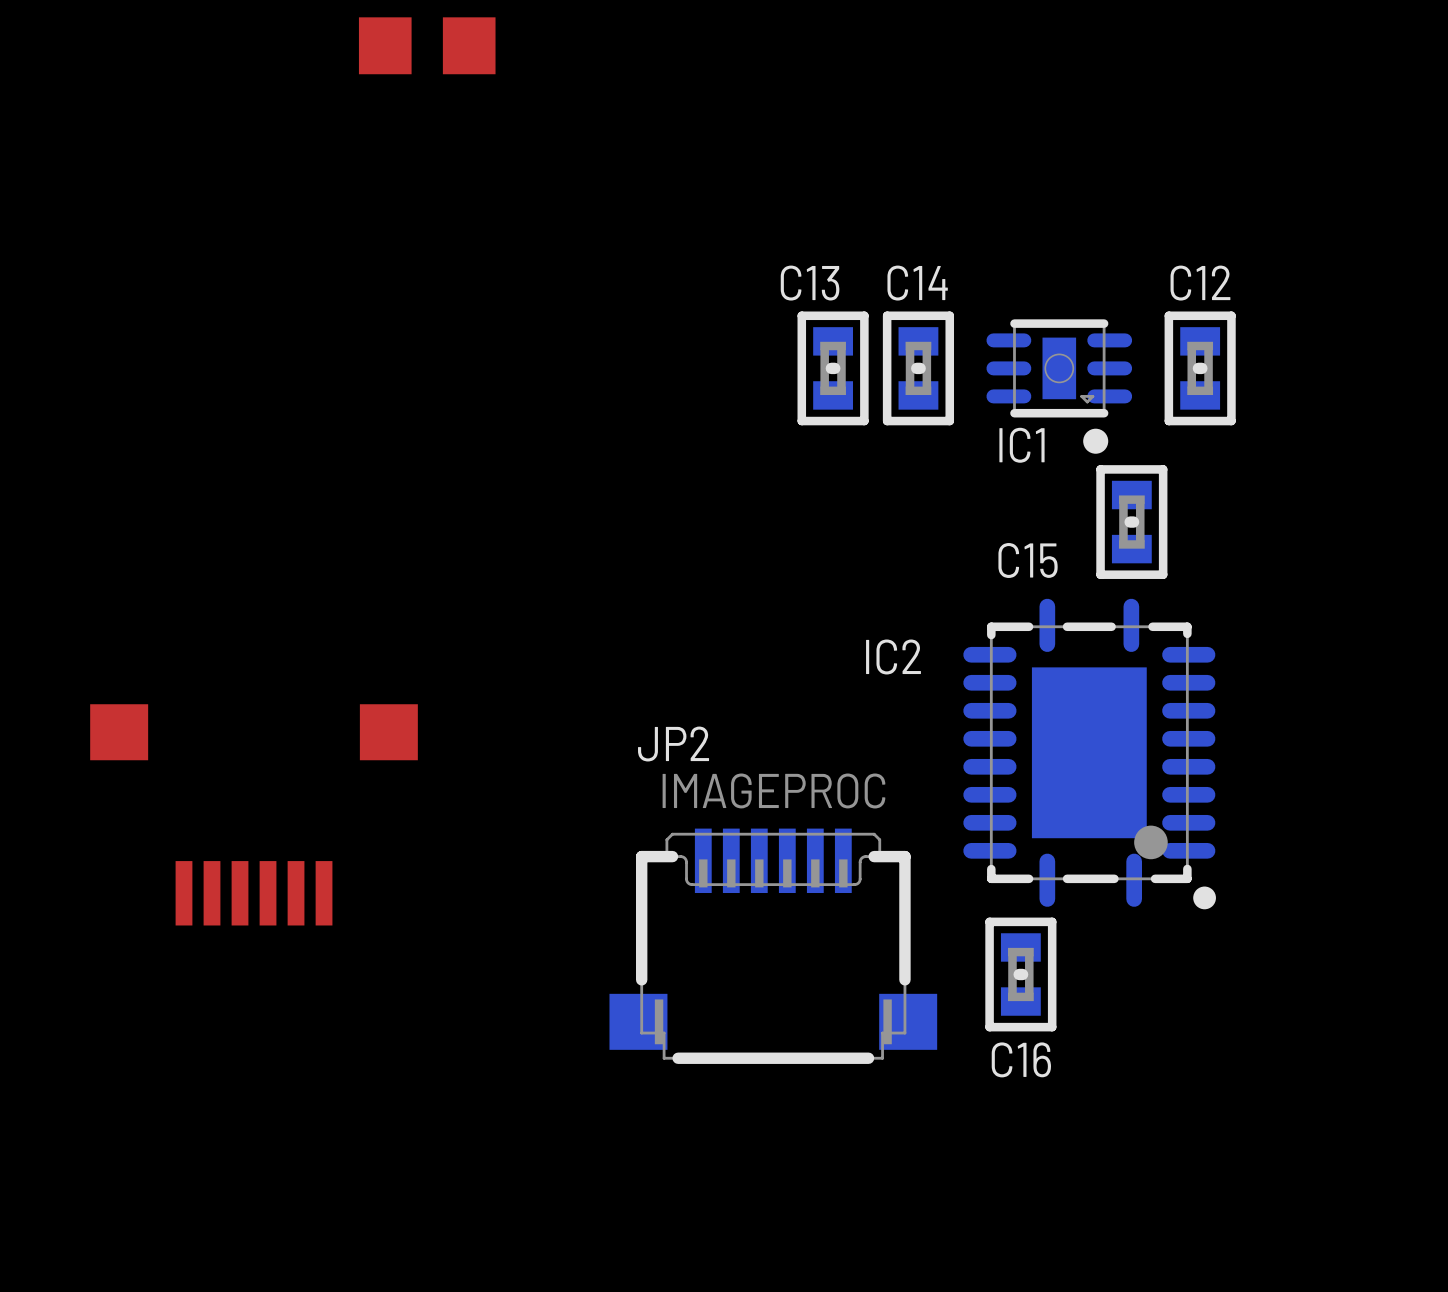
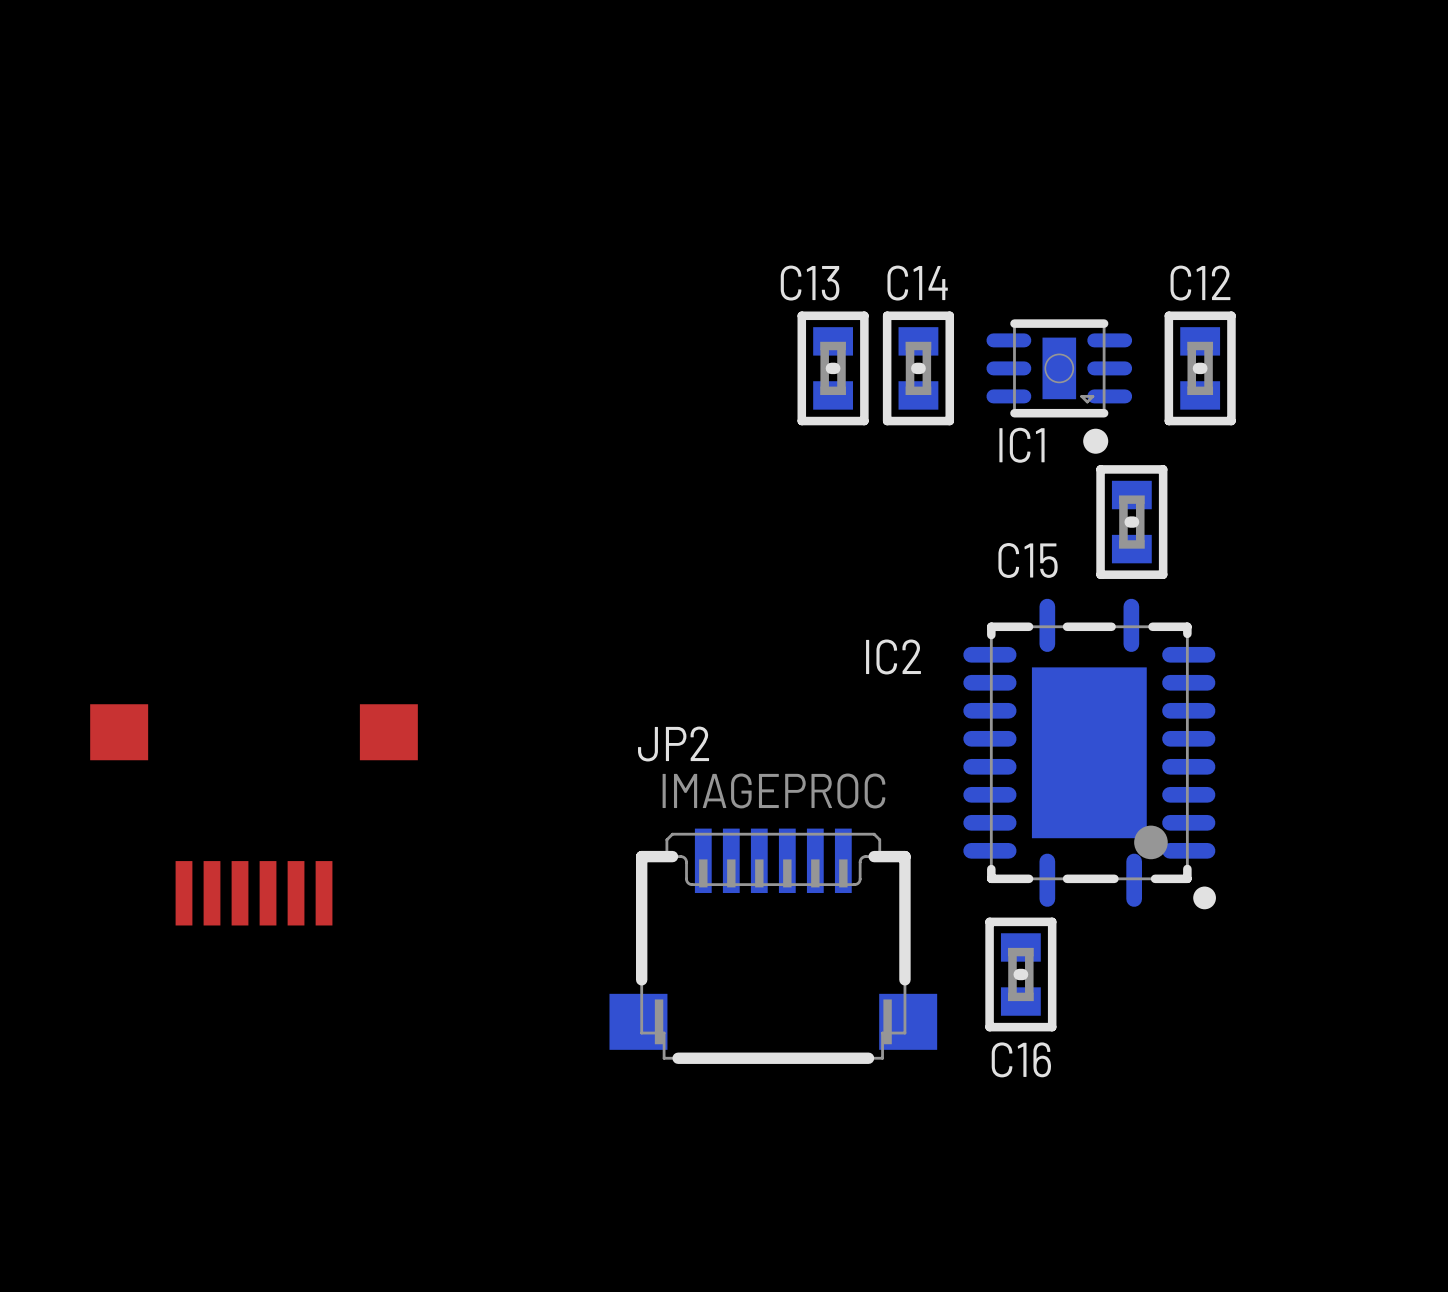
part: (427, 45) -> none

